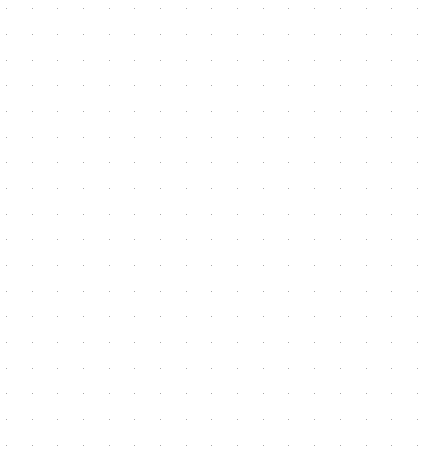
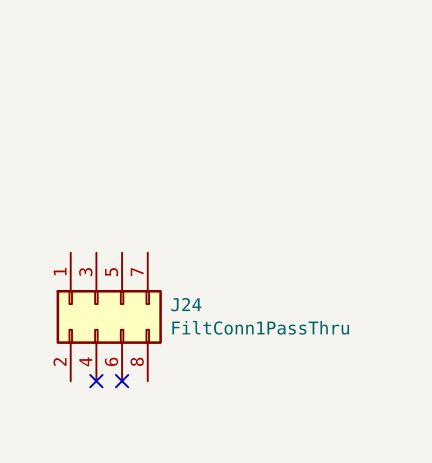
J24: none -> FiltConn1PassThru (109, 316)
no-connect mark: none -> (96, 381)
no-connect mark: none -> (122, 381)

